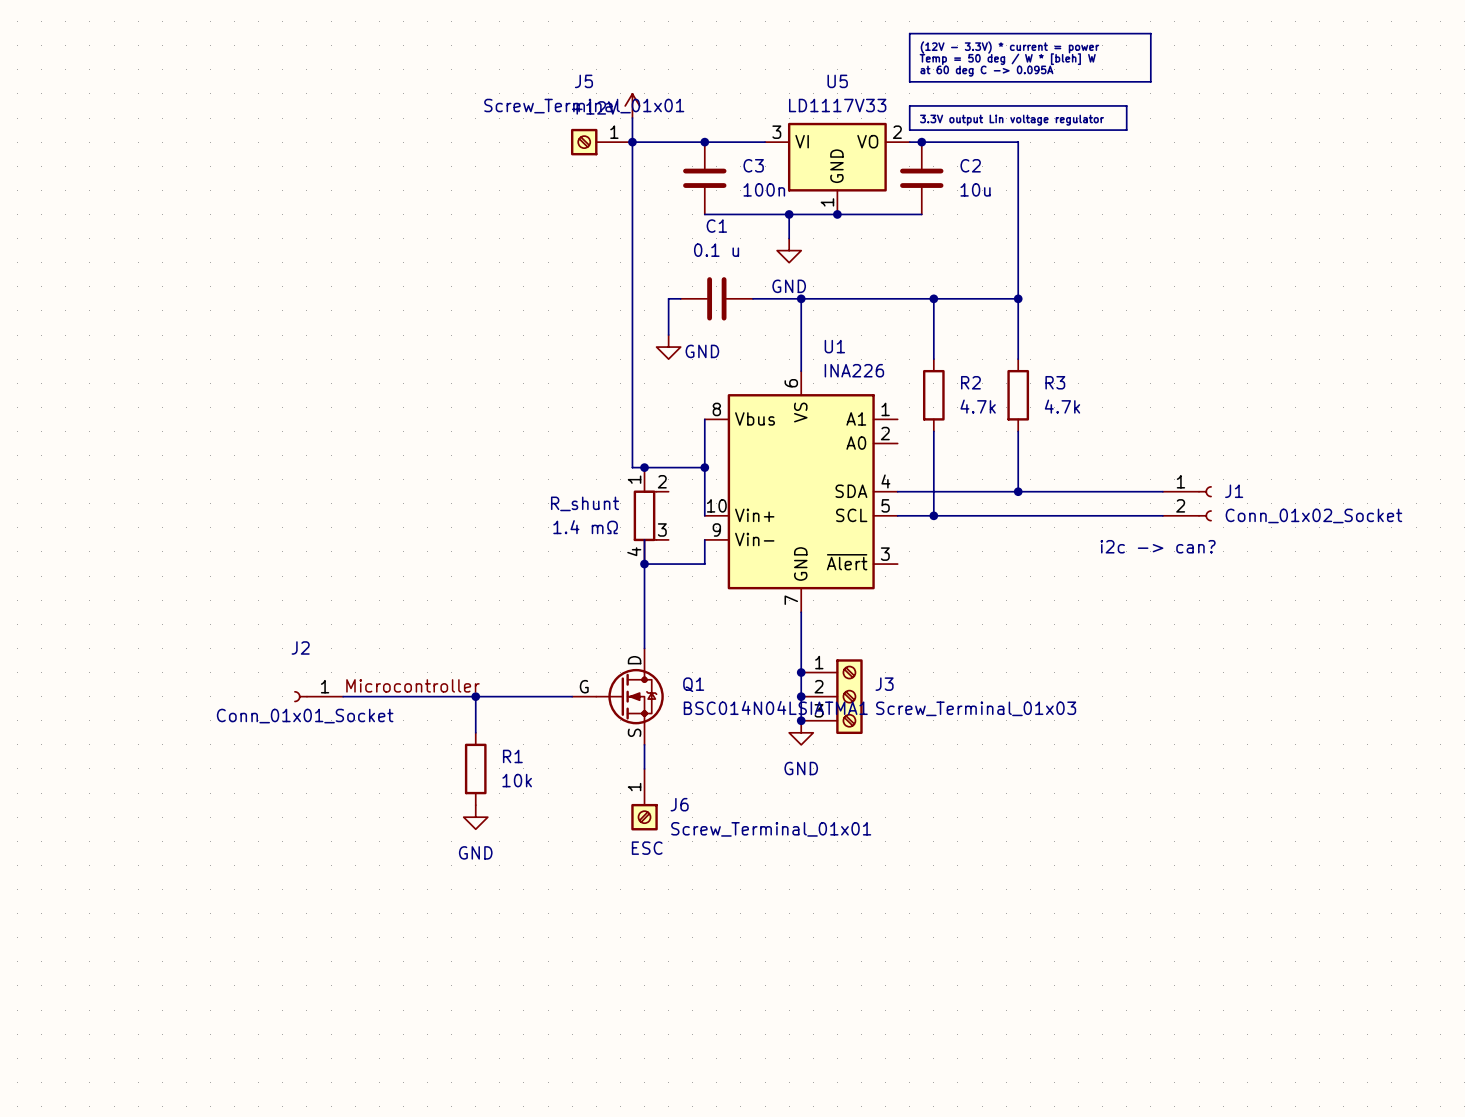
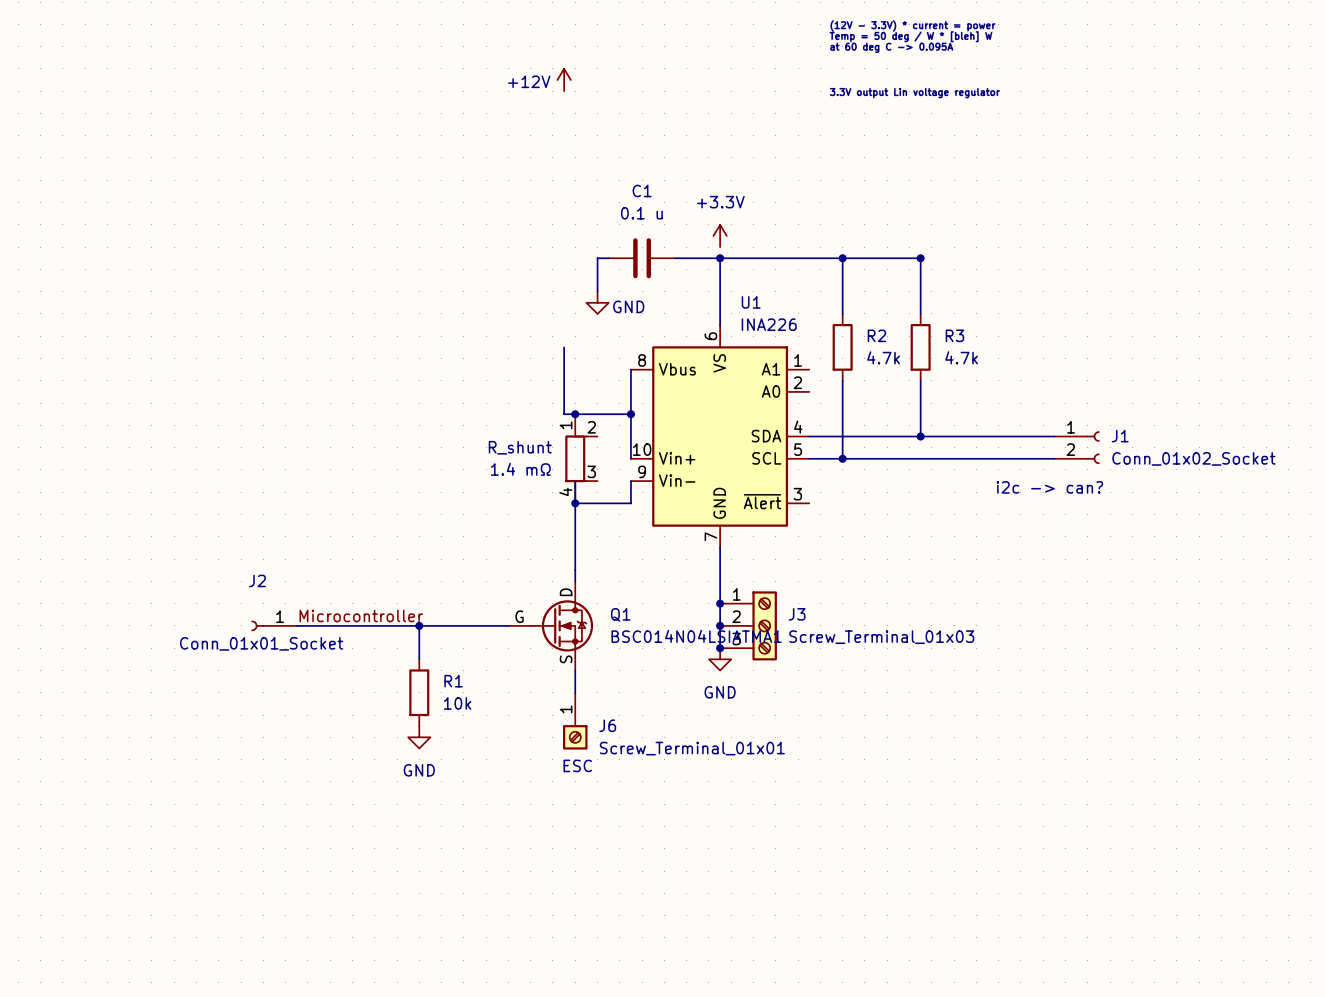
line: (909, 33) (1150, 33) (1150, 81) (909, 81) (909, 33) -> none
line: (909, 105) (909, 130) (1126, 130) (1126, 105) (909, 105) -> none
wire: (632, 118) (632, 395) -> none
J5: Screw_Terminal_01x01 (601, 142) -> none
wire: (632, 142) (765, 142) -> none
junction: (632, 142) -> none
junction: (704, 142) -> none
wire: (909, 142) (1018, 142) (1018, 298) -> none
junction: (921, 142) -> none
U5: LD1117V33 (837, 168) -> none
C3: 100n (704, 178) -> none
C2: 10u (921, 178) -> none
wire: (704, 214) (921, 214) -> none
wire: (789, 214) (789, 238) -> none
junction: (789, 214) -> none
junction: (837, 214) -> none
power symbol: GND (789, 250) -> none
power symbol: none -> +3.3V (720, 235)

